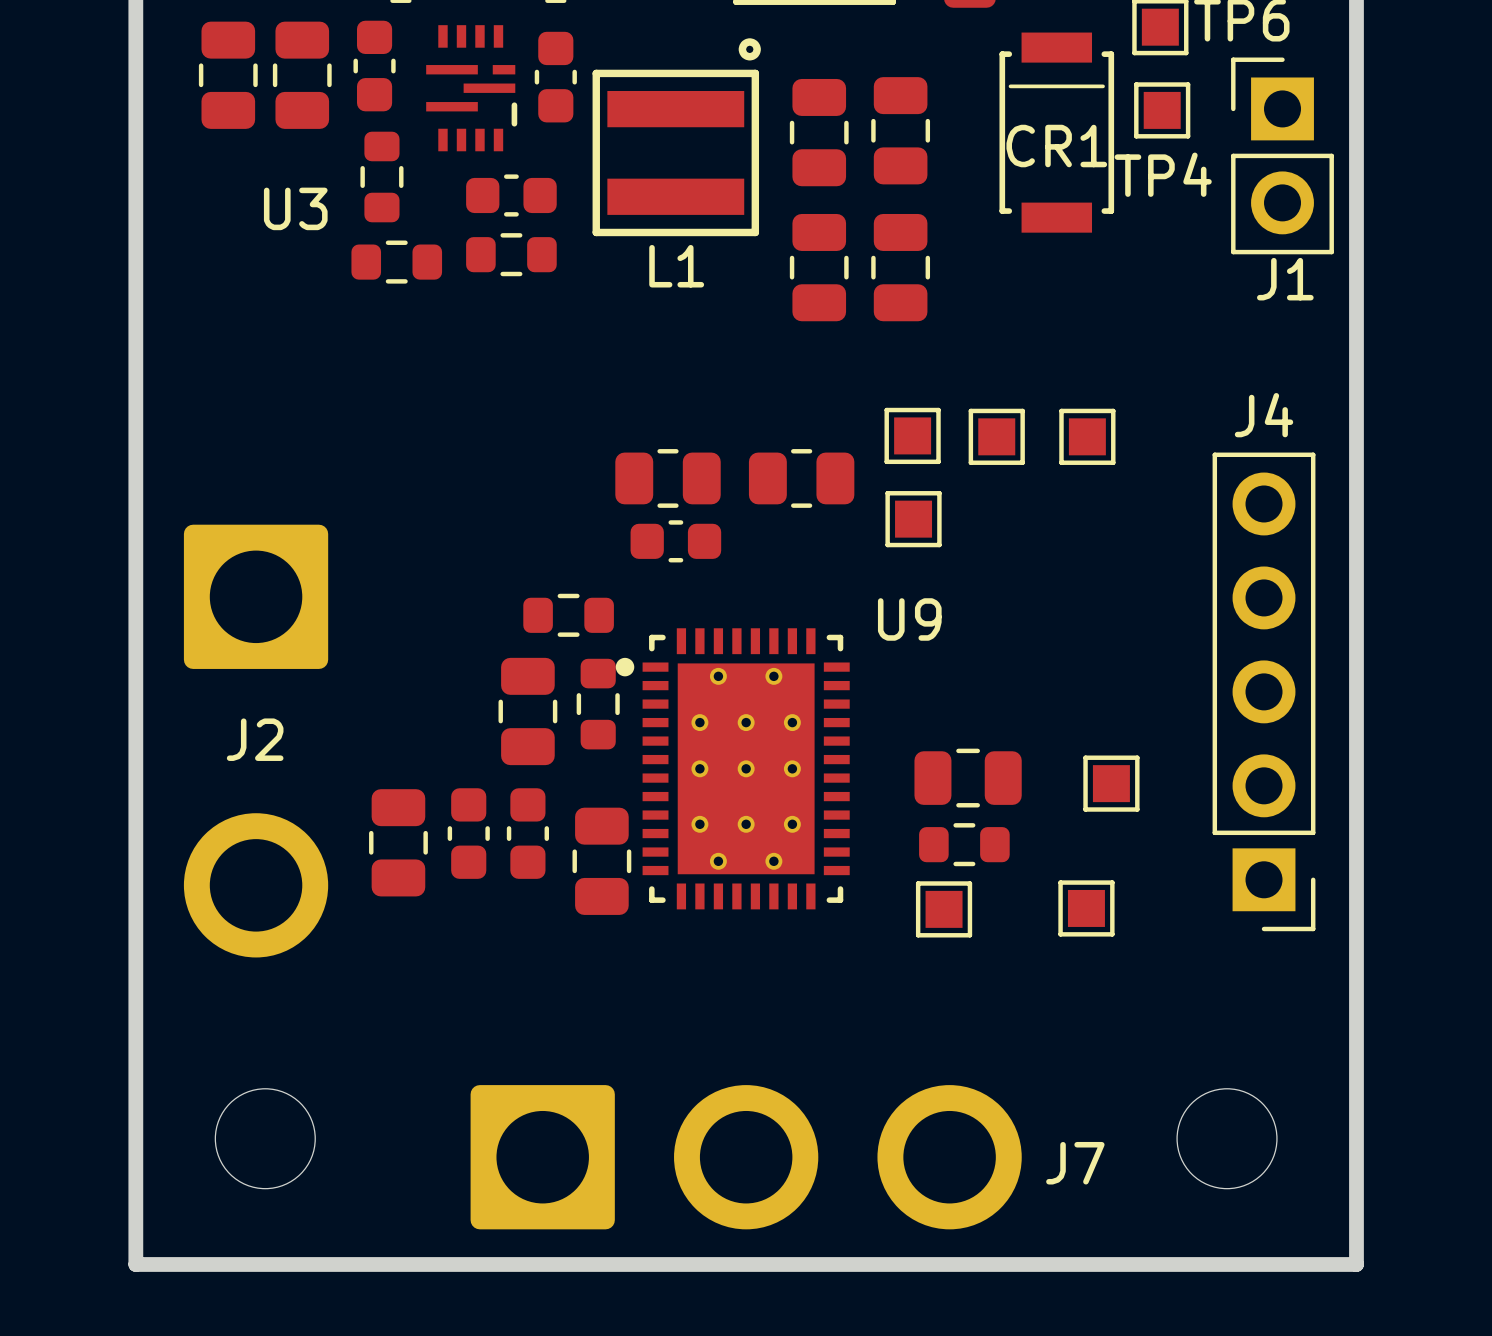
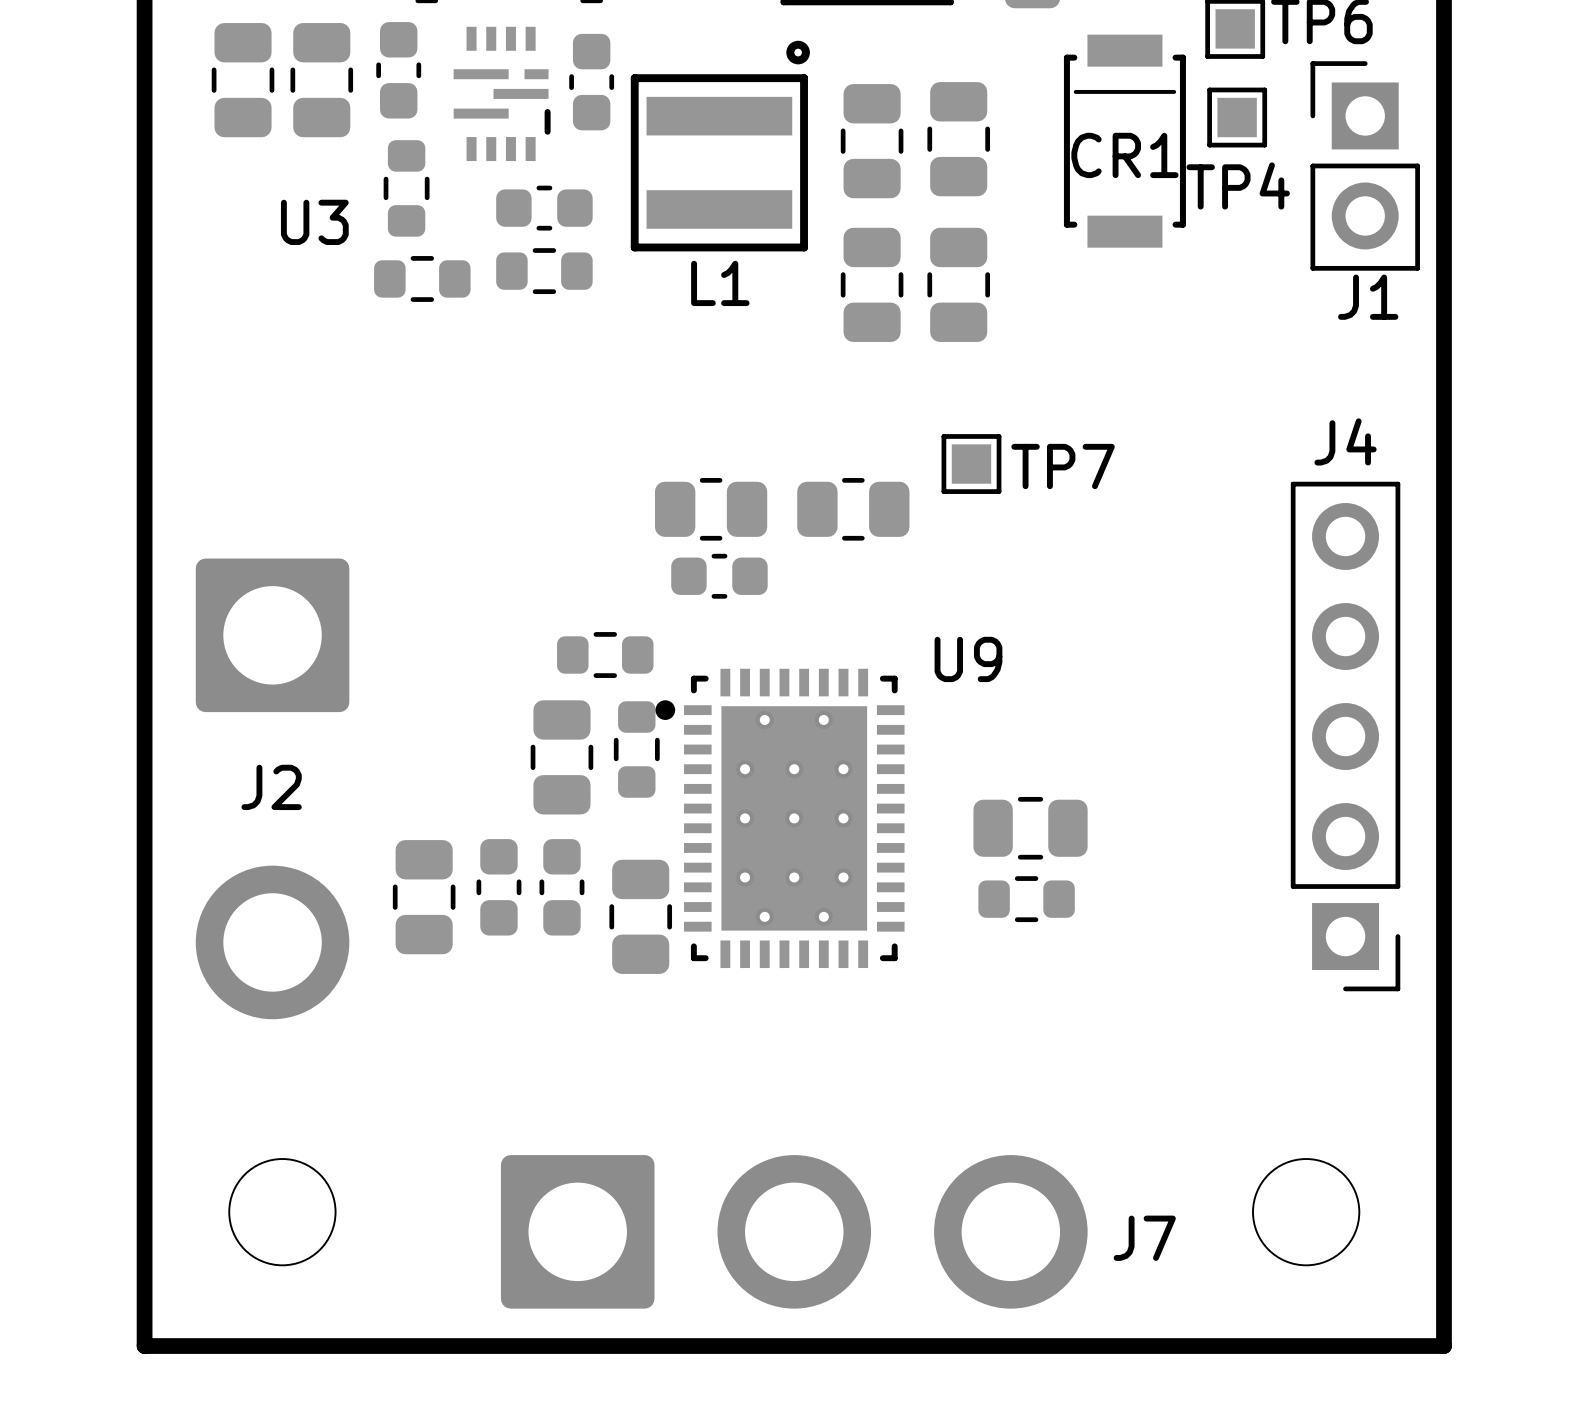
part: (996, 436) -> none
part: (1087, 436) -> none
TP7 name: none -> TP7 (1063, 466)
part: (913, 519) -> none
part: (1111, 783) -> none
part: (1086, 908) -> none
part: (944, 909) -> none

